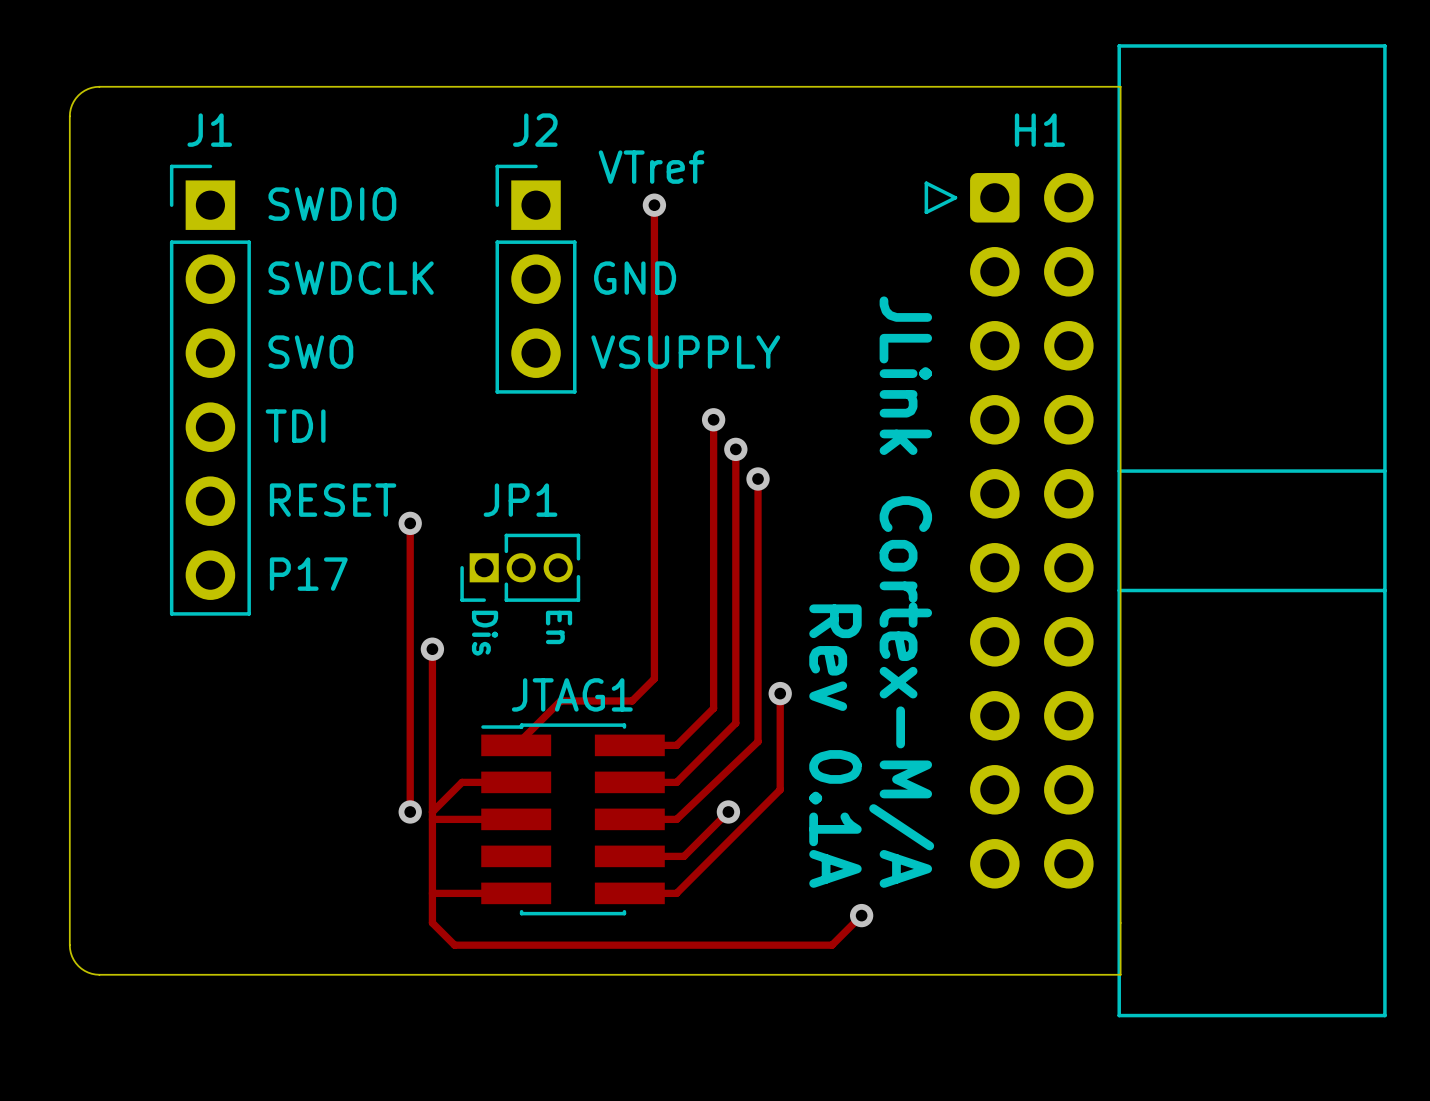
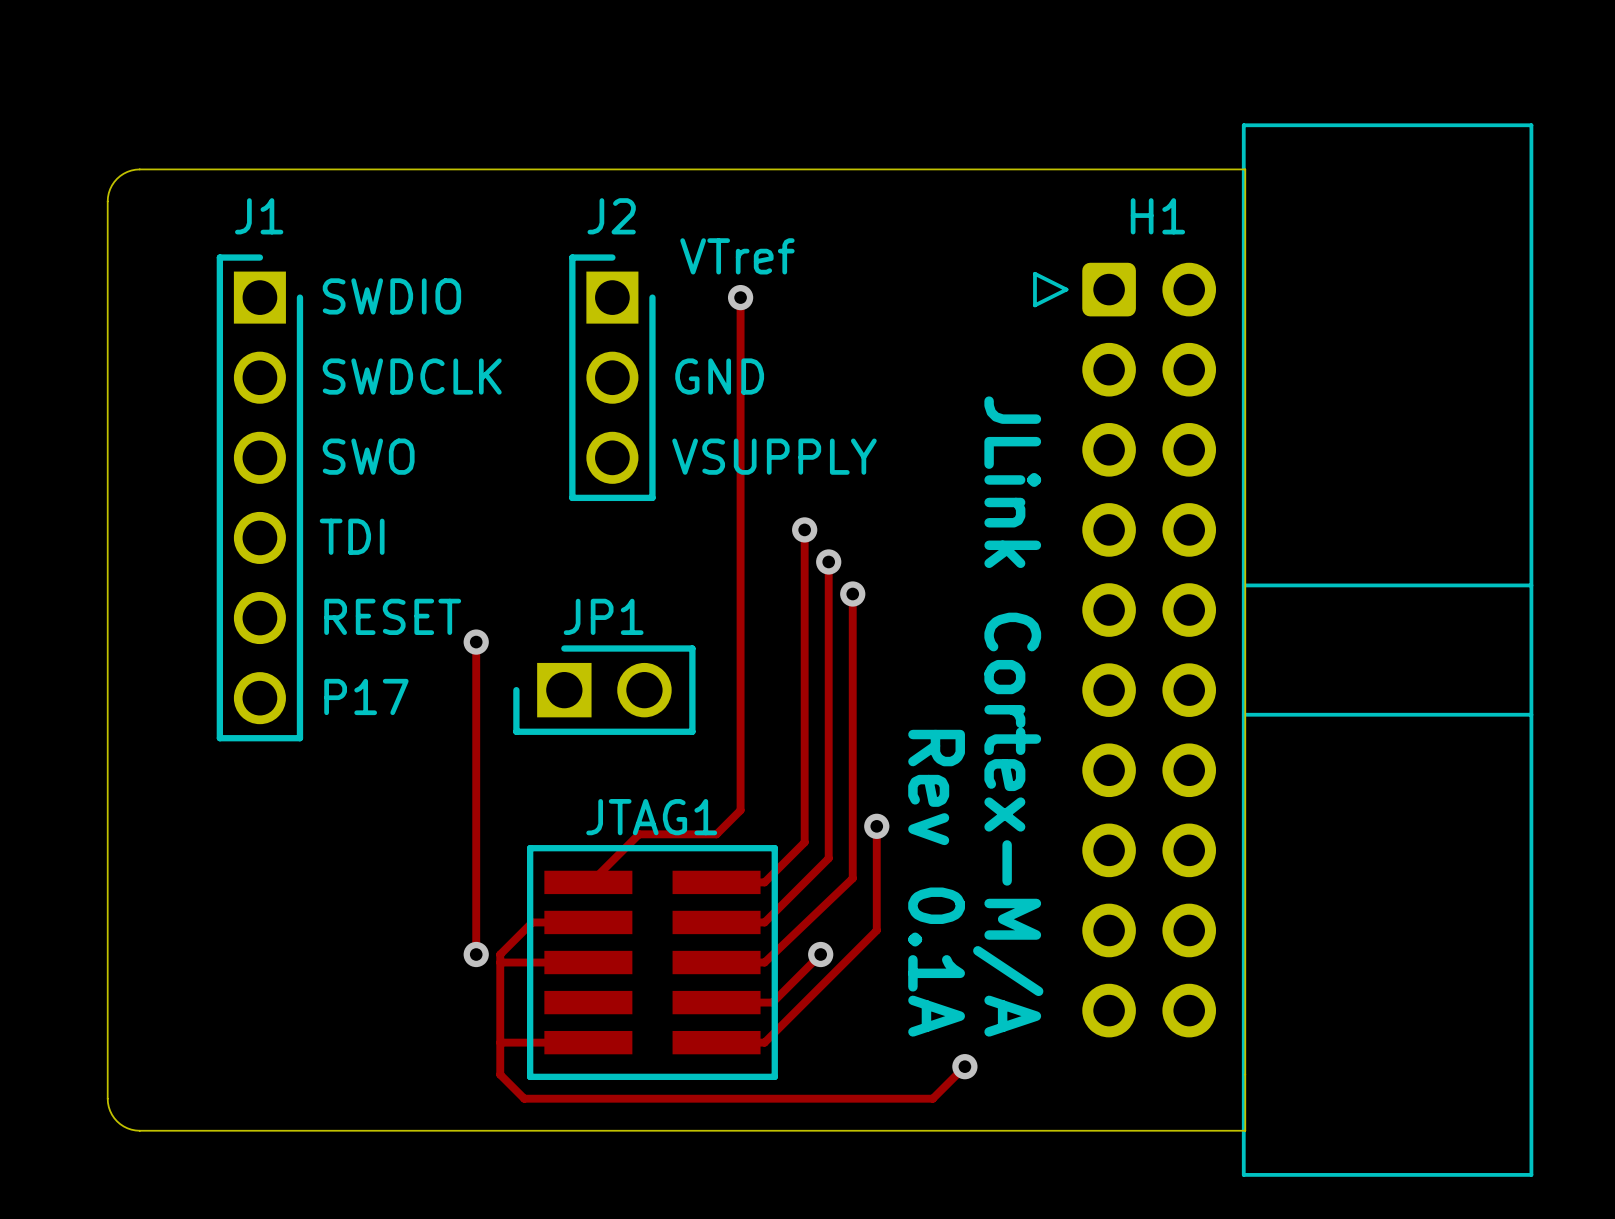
J1 footprint: [169, 164, 251, 616] -> [216, 254, 304, 742]
J2 footprint: [495, 164, 577, 394] -> [569, 254, 656, 502]
JP1 footprint: [460, 533, 581, 602] -> [513, 645, 696, 735]
text: En (559, 627) -> none
text: Dis (485, 633) -> none
track: (432, 649) (432, 811) -> none
via: (432, 649) -> none
JTAG1 footprint: [481, 723, 665, 916] -> [527, 845, 778, 1081]

